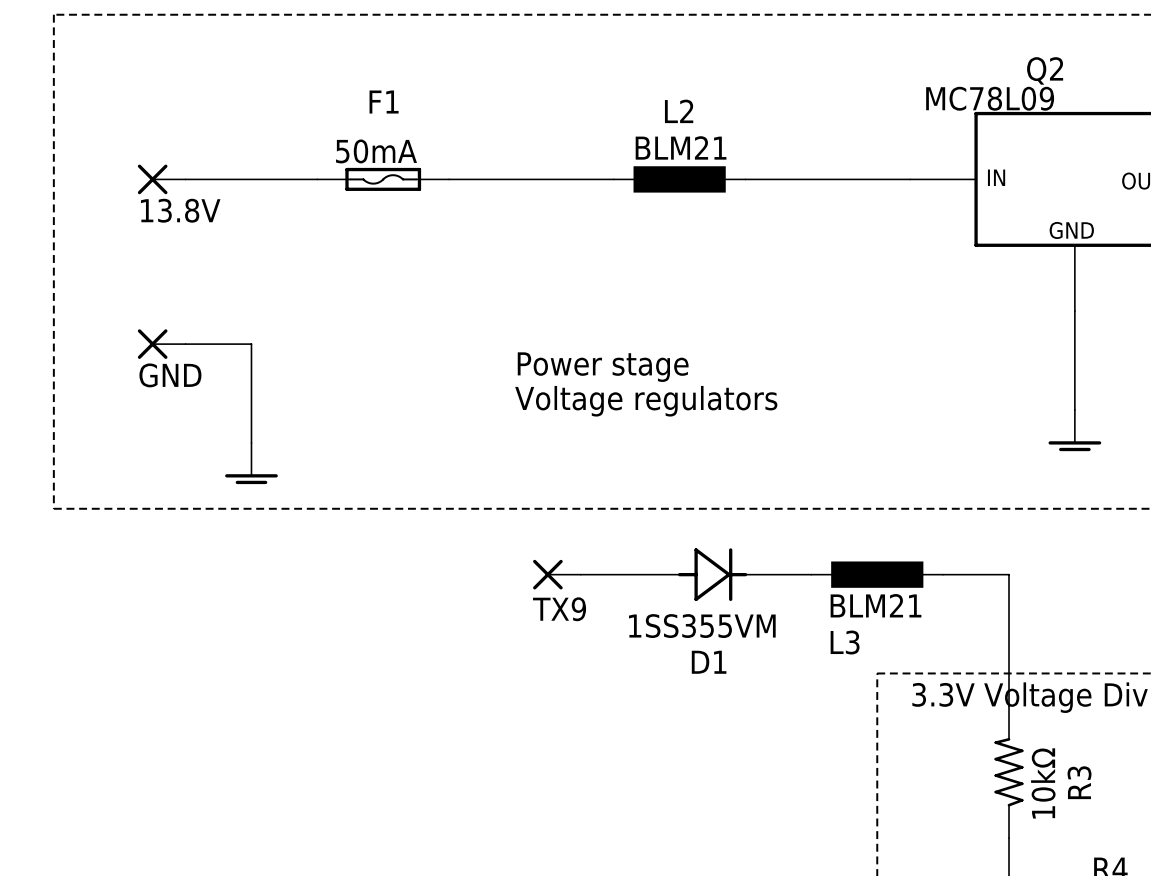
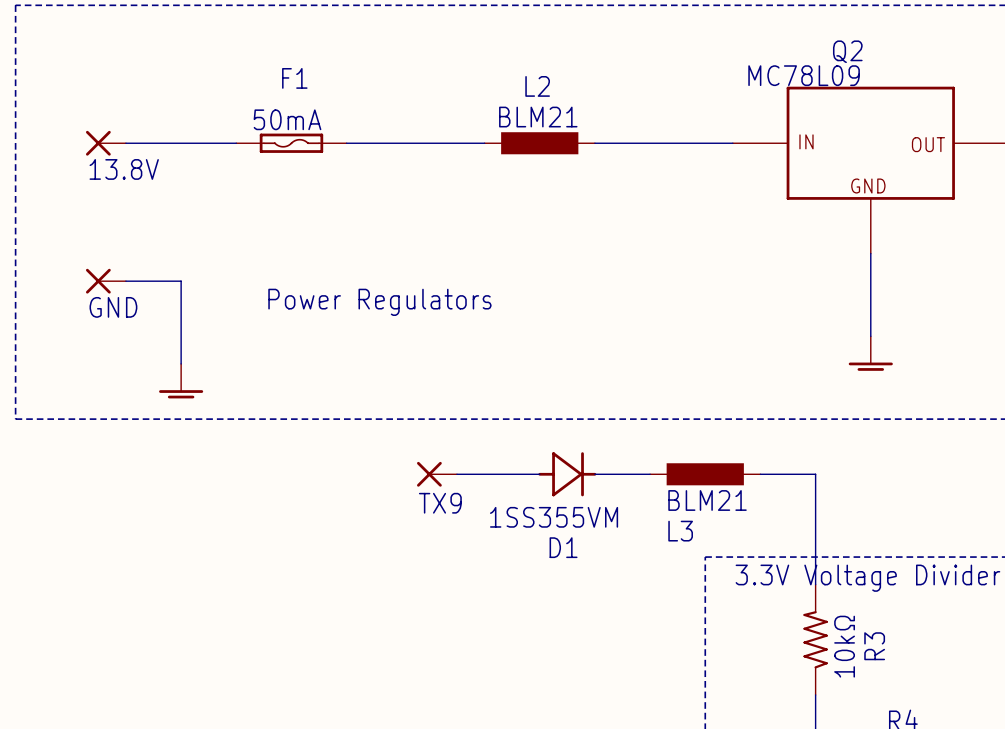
text: Power stage (603, 367) -> none
text: Voltage regulators (646, 401) -> Power Regulators (379, 302)

